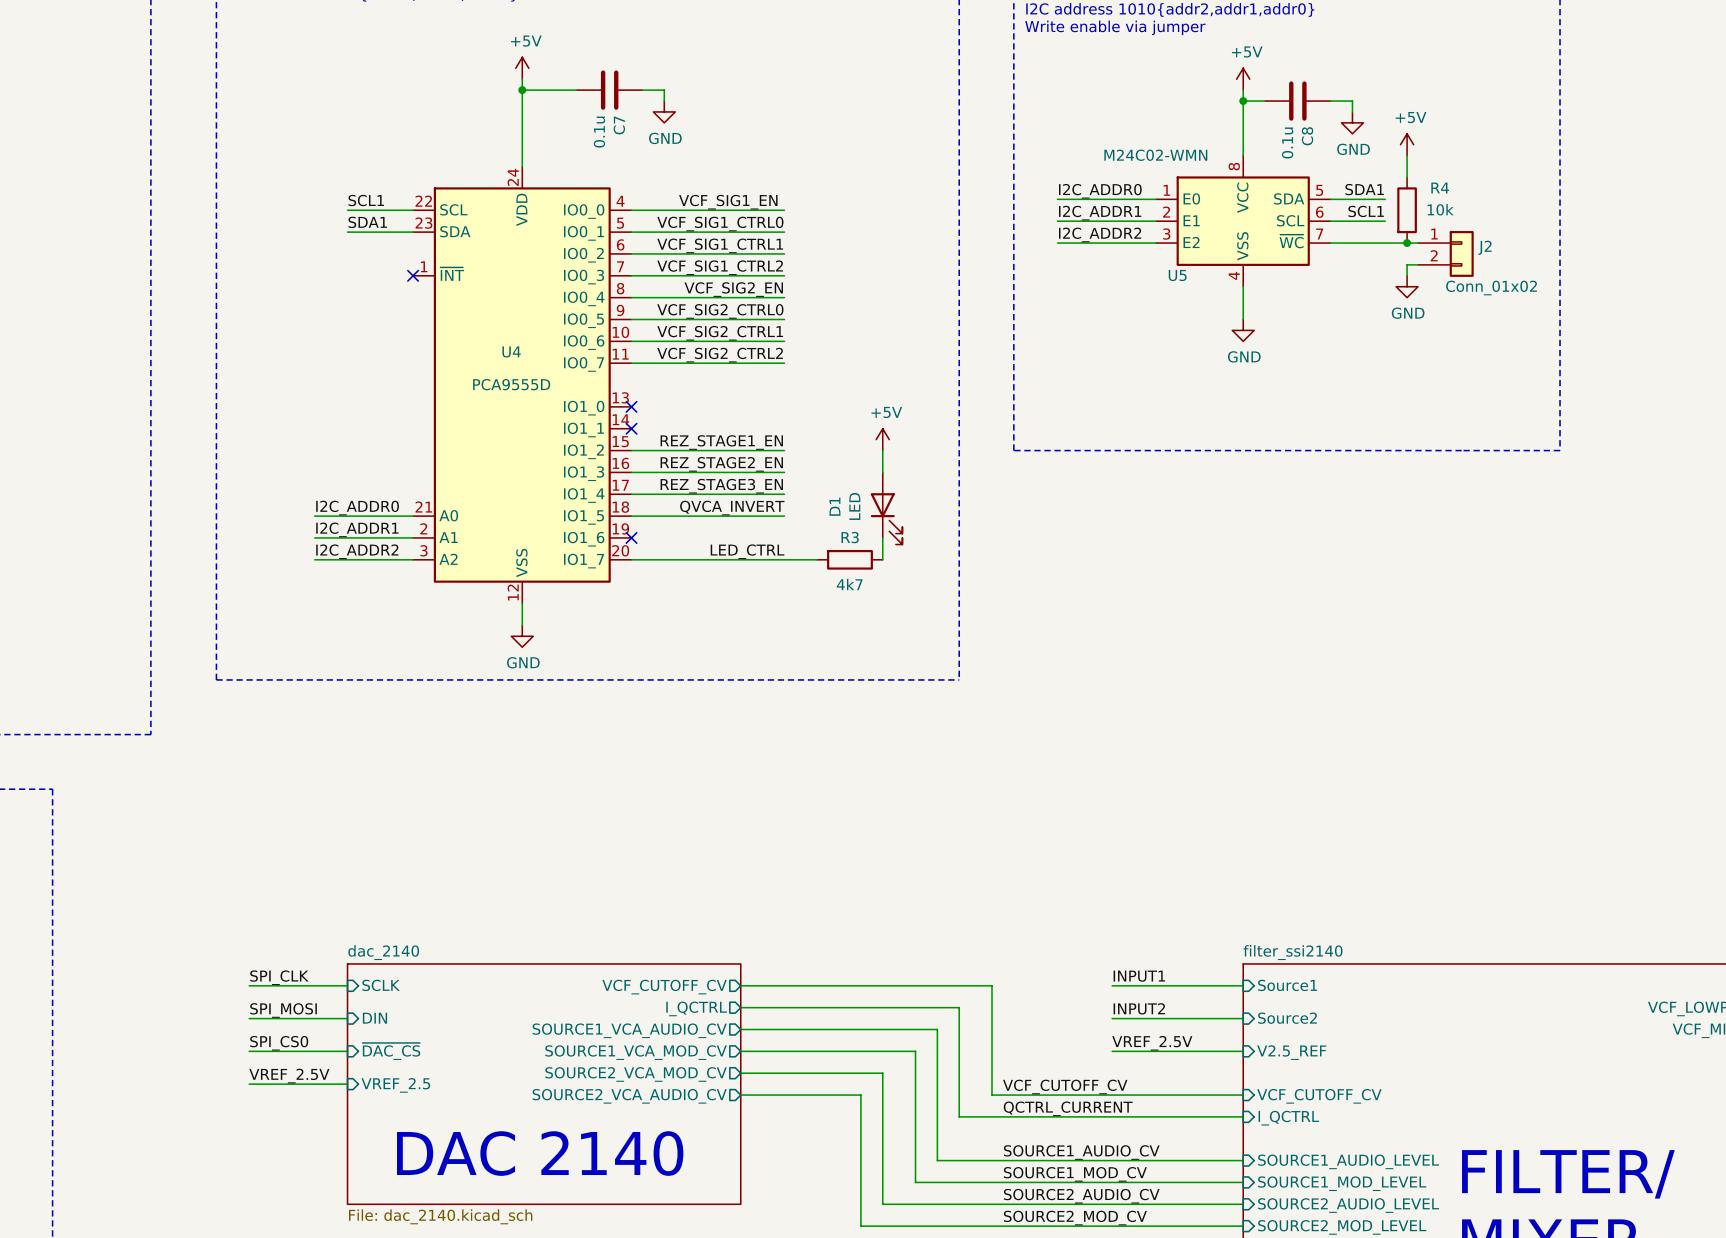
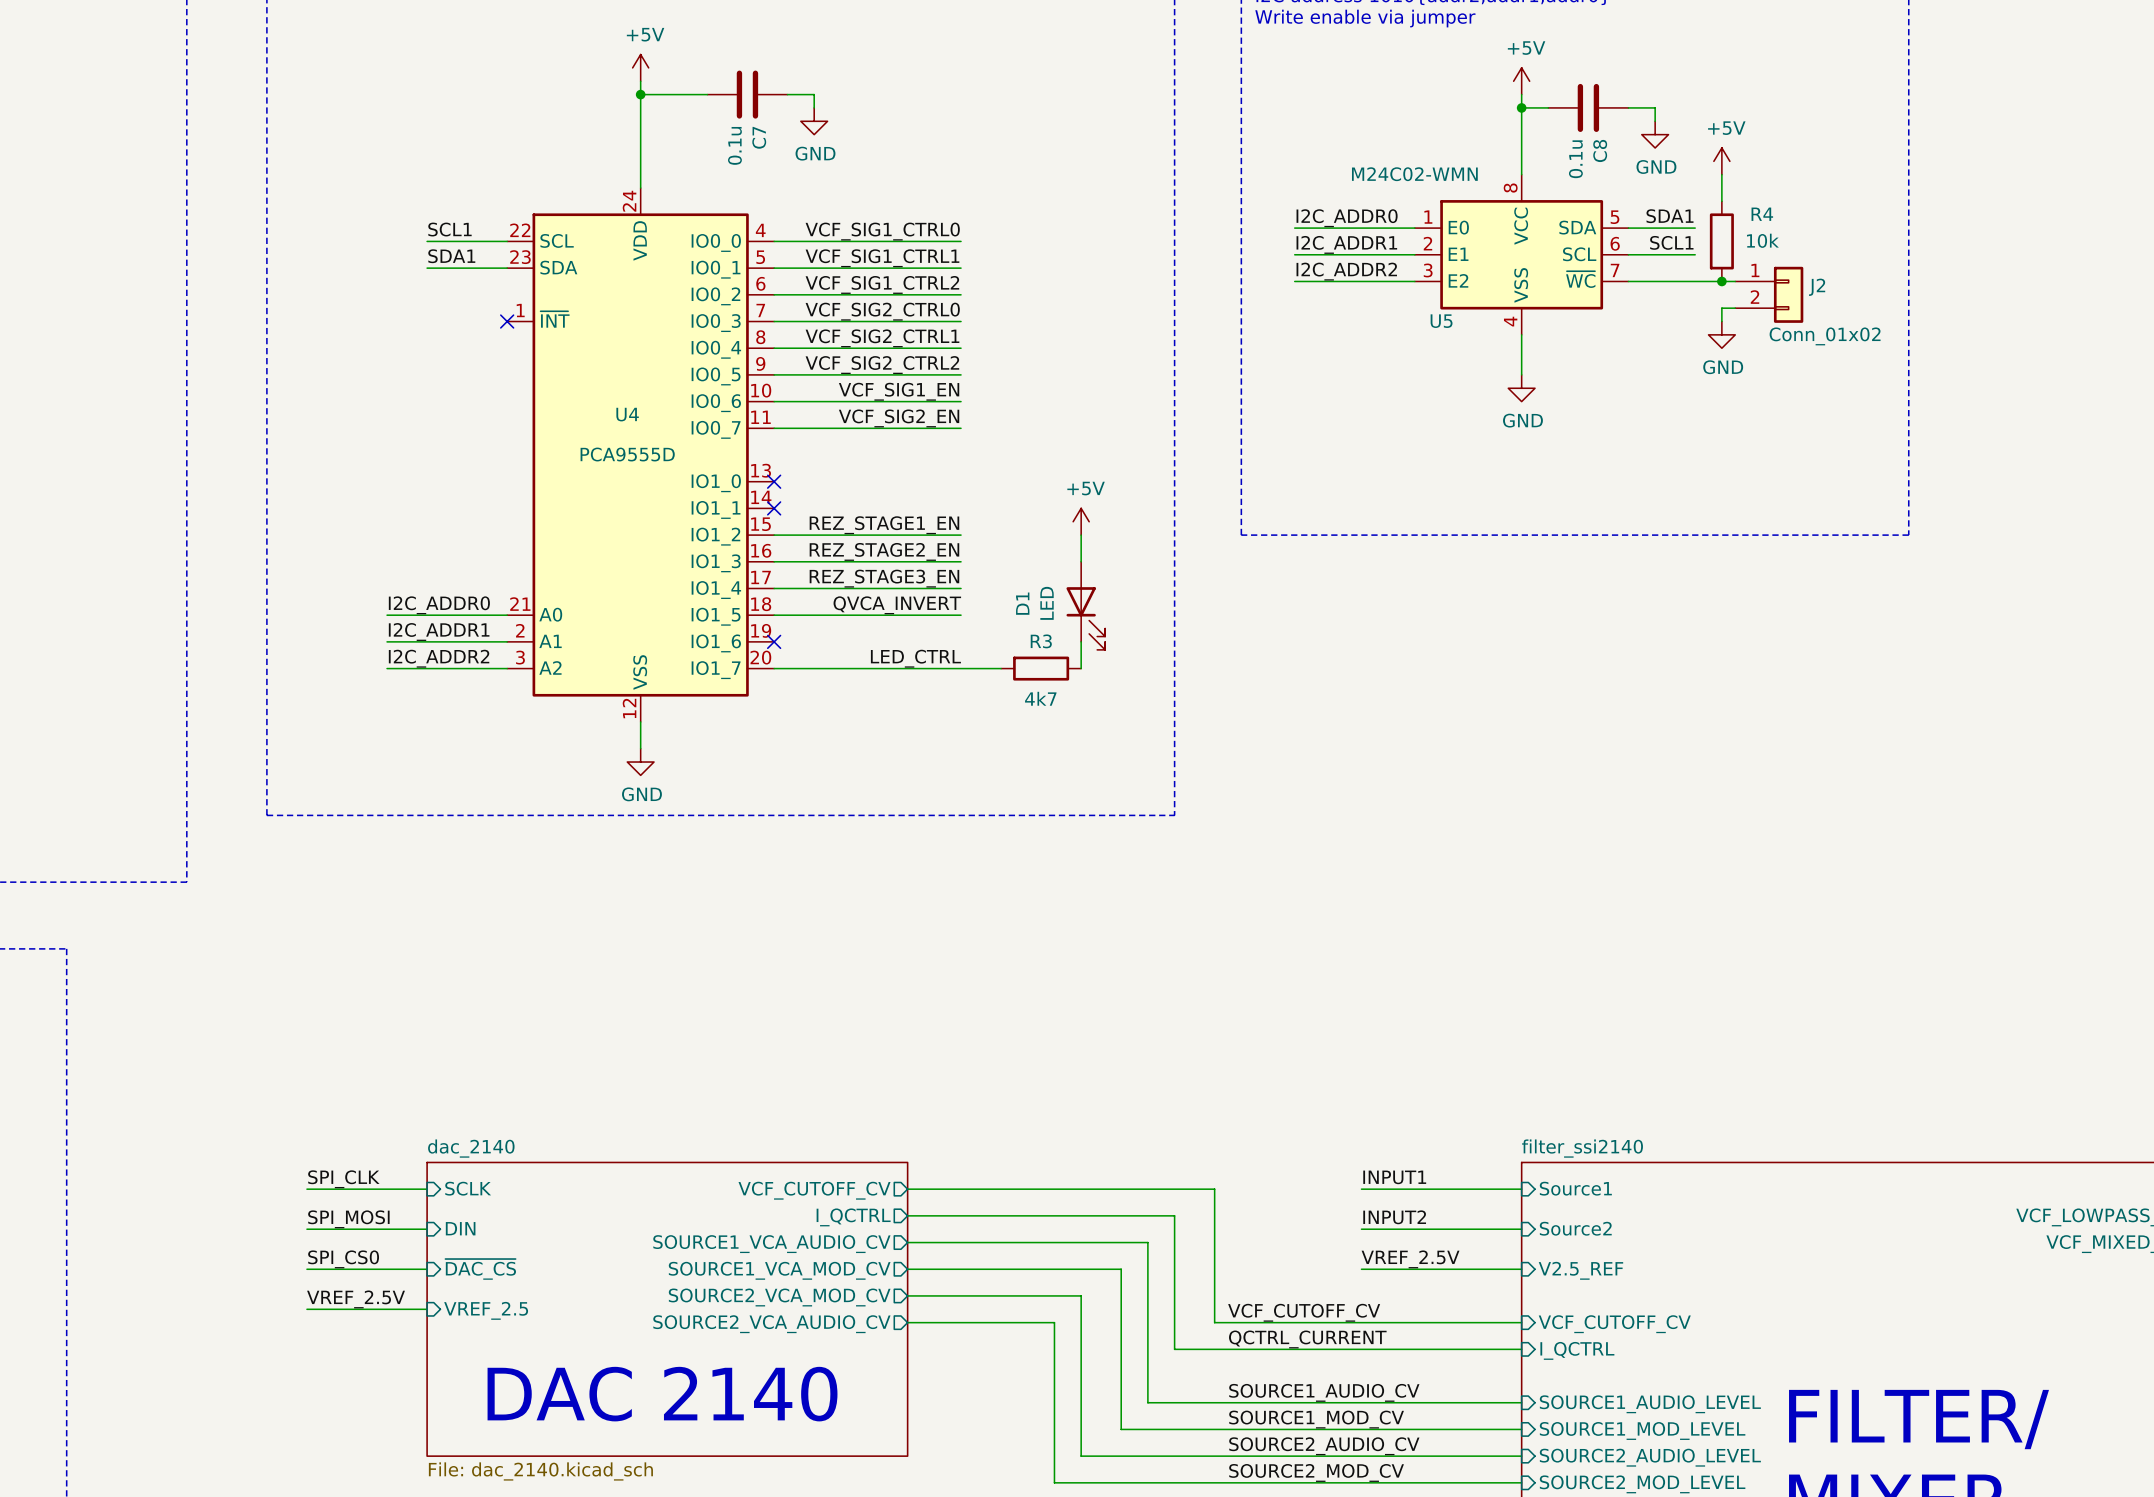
label: VCF_SIG1_EN (728, 202) -> VCF_SIG1_CTRL0 (882, 231)
label: VCF_SIG1_CTRL0 (720, 224) -> VCF_SIG1_CTRL1 (882, 258)
label: VCF_SIG1_CTRL1 (720, 245) -> VCF_SIG1_CTRL2 (882, 284)
label: VCF_SIG1_CTRL2 (720, 267) -> VCF_SIG2_CTRL0 (882, 311)
label: VCF_SIG2_EN (733, 289) -> VCF_SIG2_CTRL1 (882, 338)
label: VCF_SIG2_CTRL0 (720, 311) -> VCF_SIG2_CTRL2 (882, 365)
label: VCF_SIG2_CTRL1 (720, 333) -> VCF_SIG1_EN (899, 391)
label: VCF_SIG2_CTRL2 (720, 355) -> VCF_SIG2_EN (899, 418)

